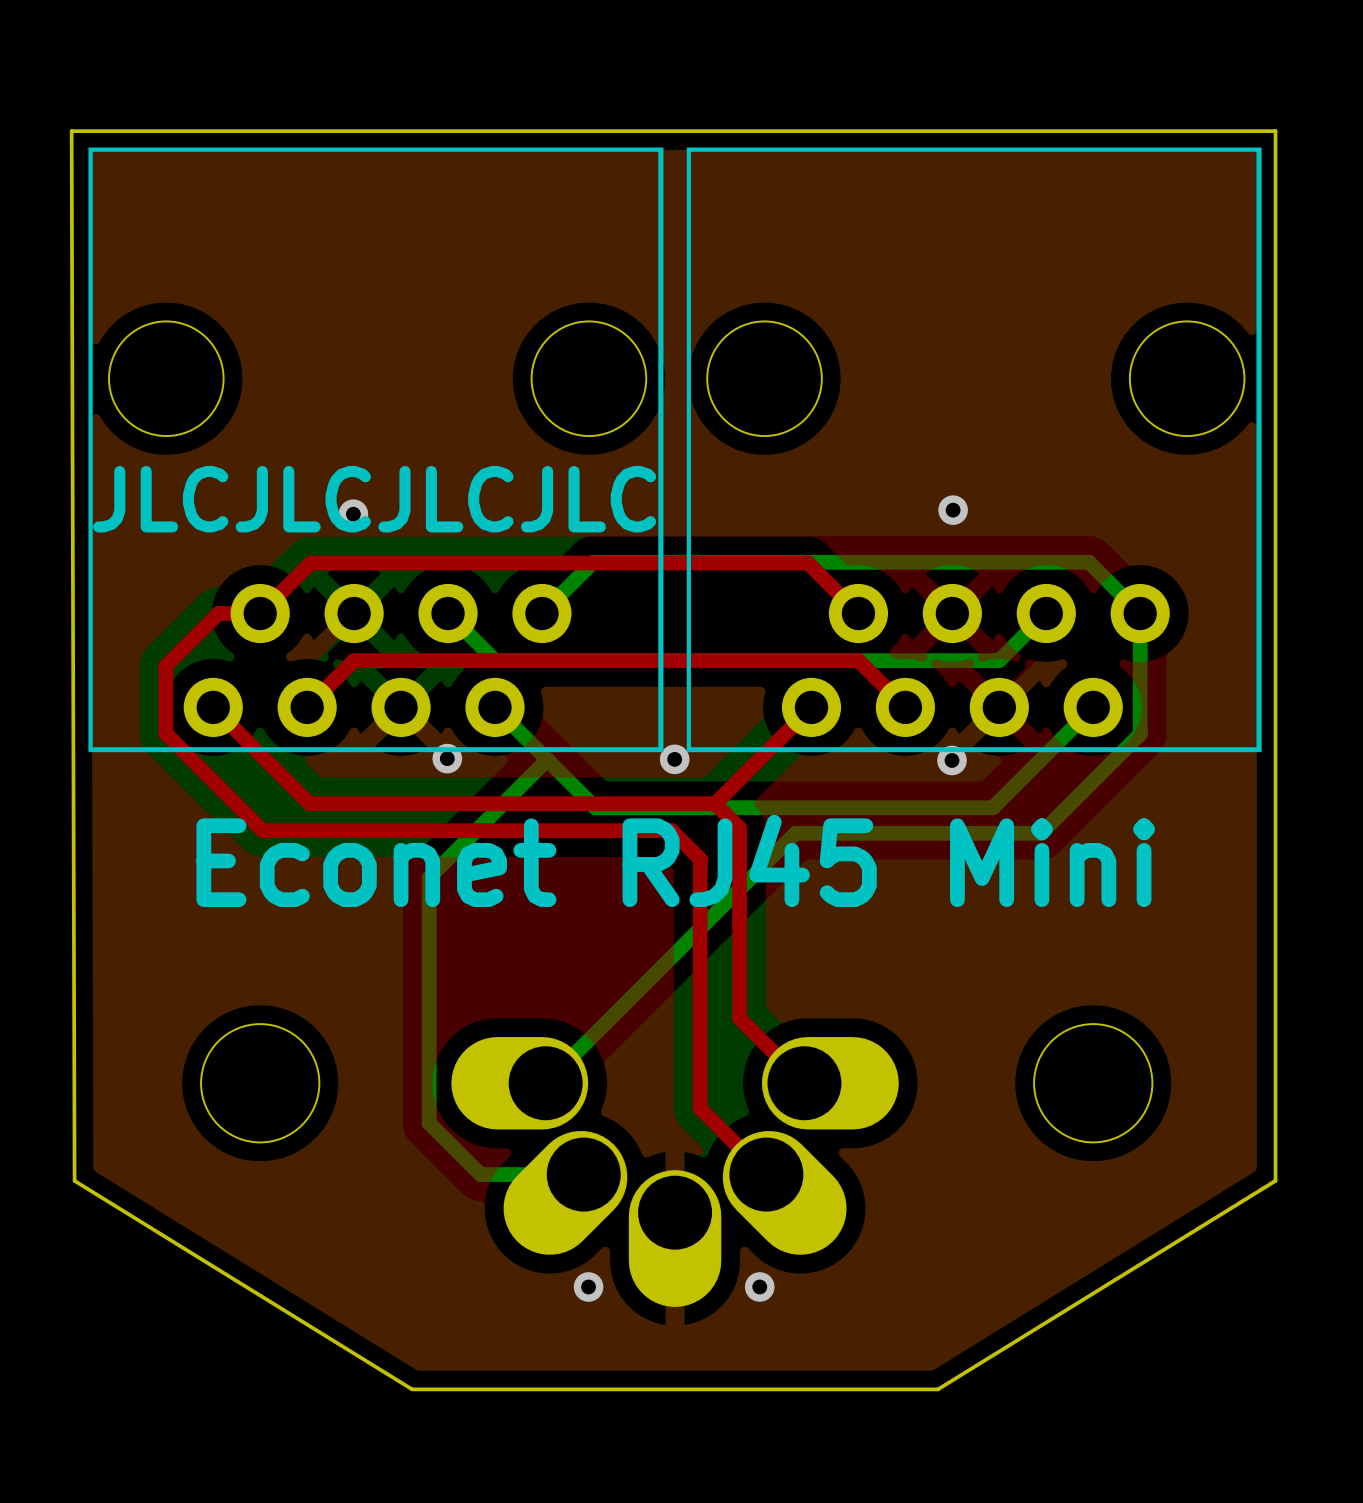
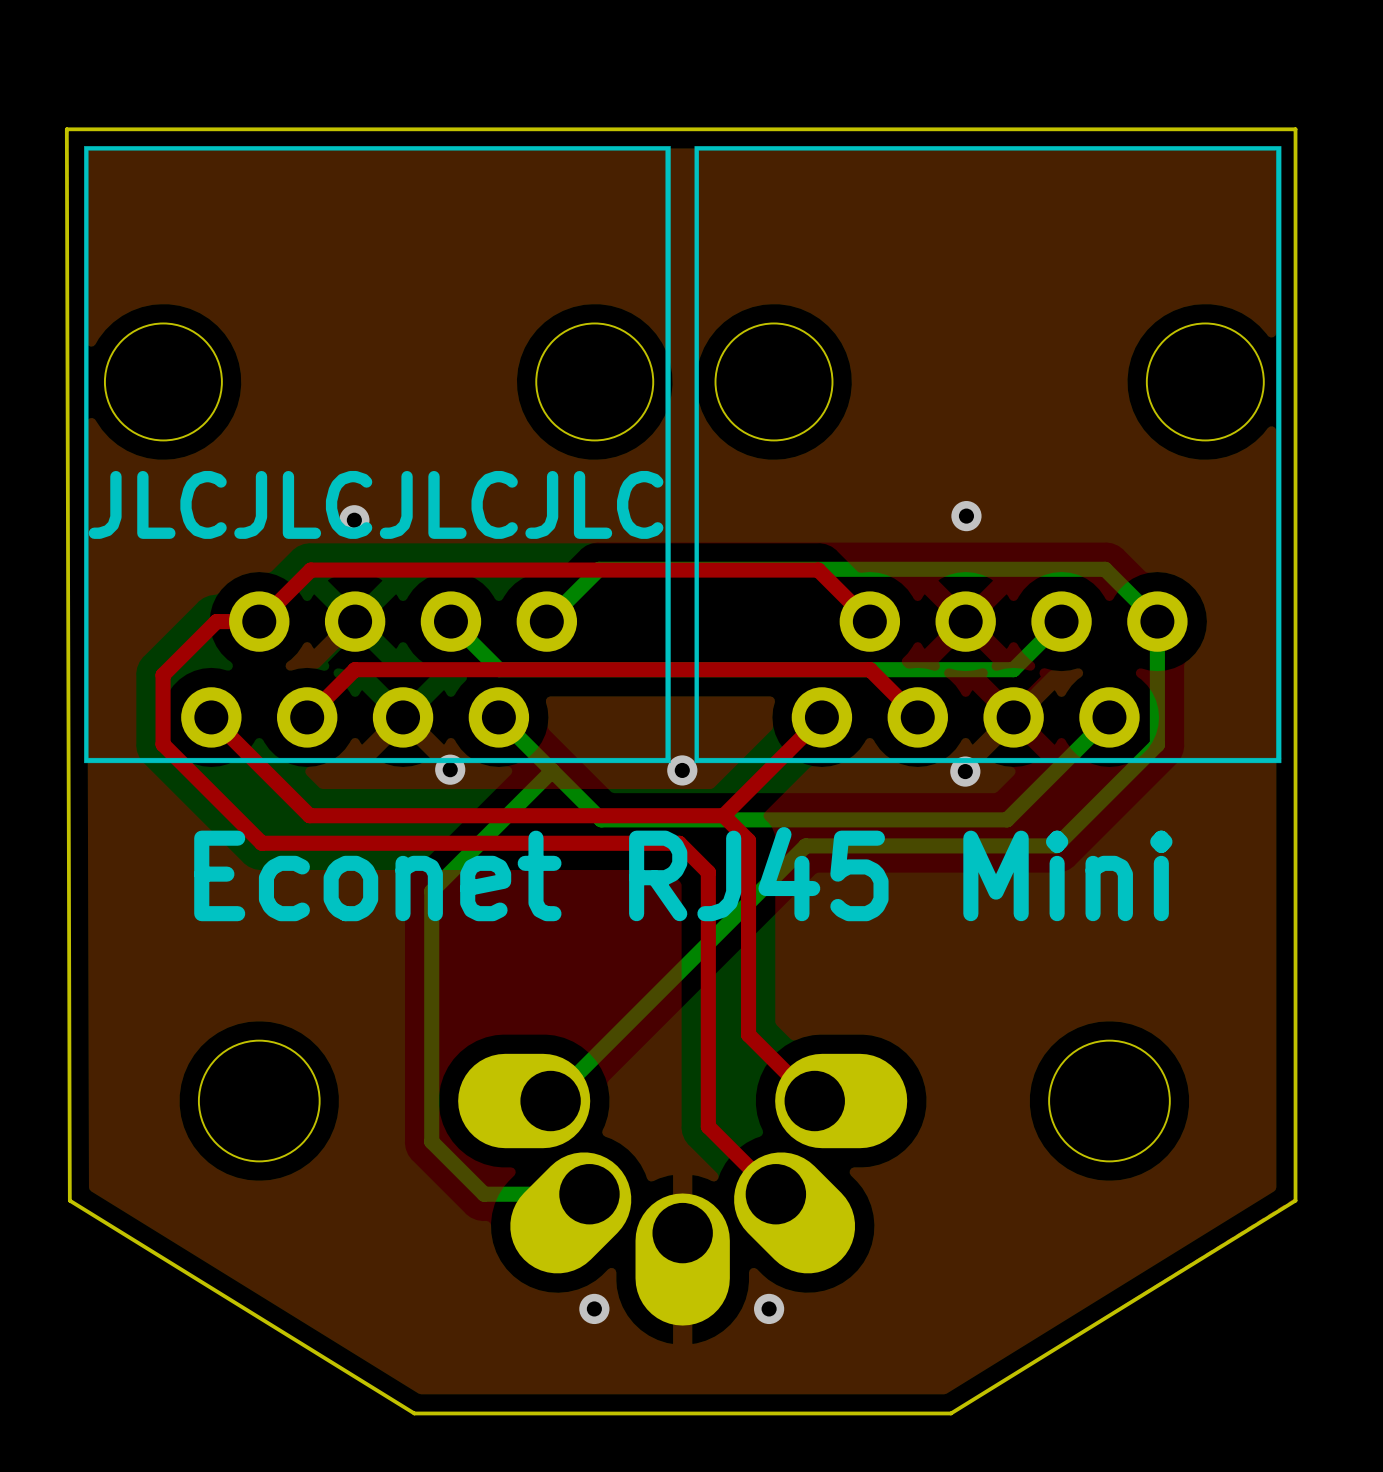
part footprint: [451, 1037, 899, 1307] -> [458, 1053, 908, 1326]

